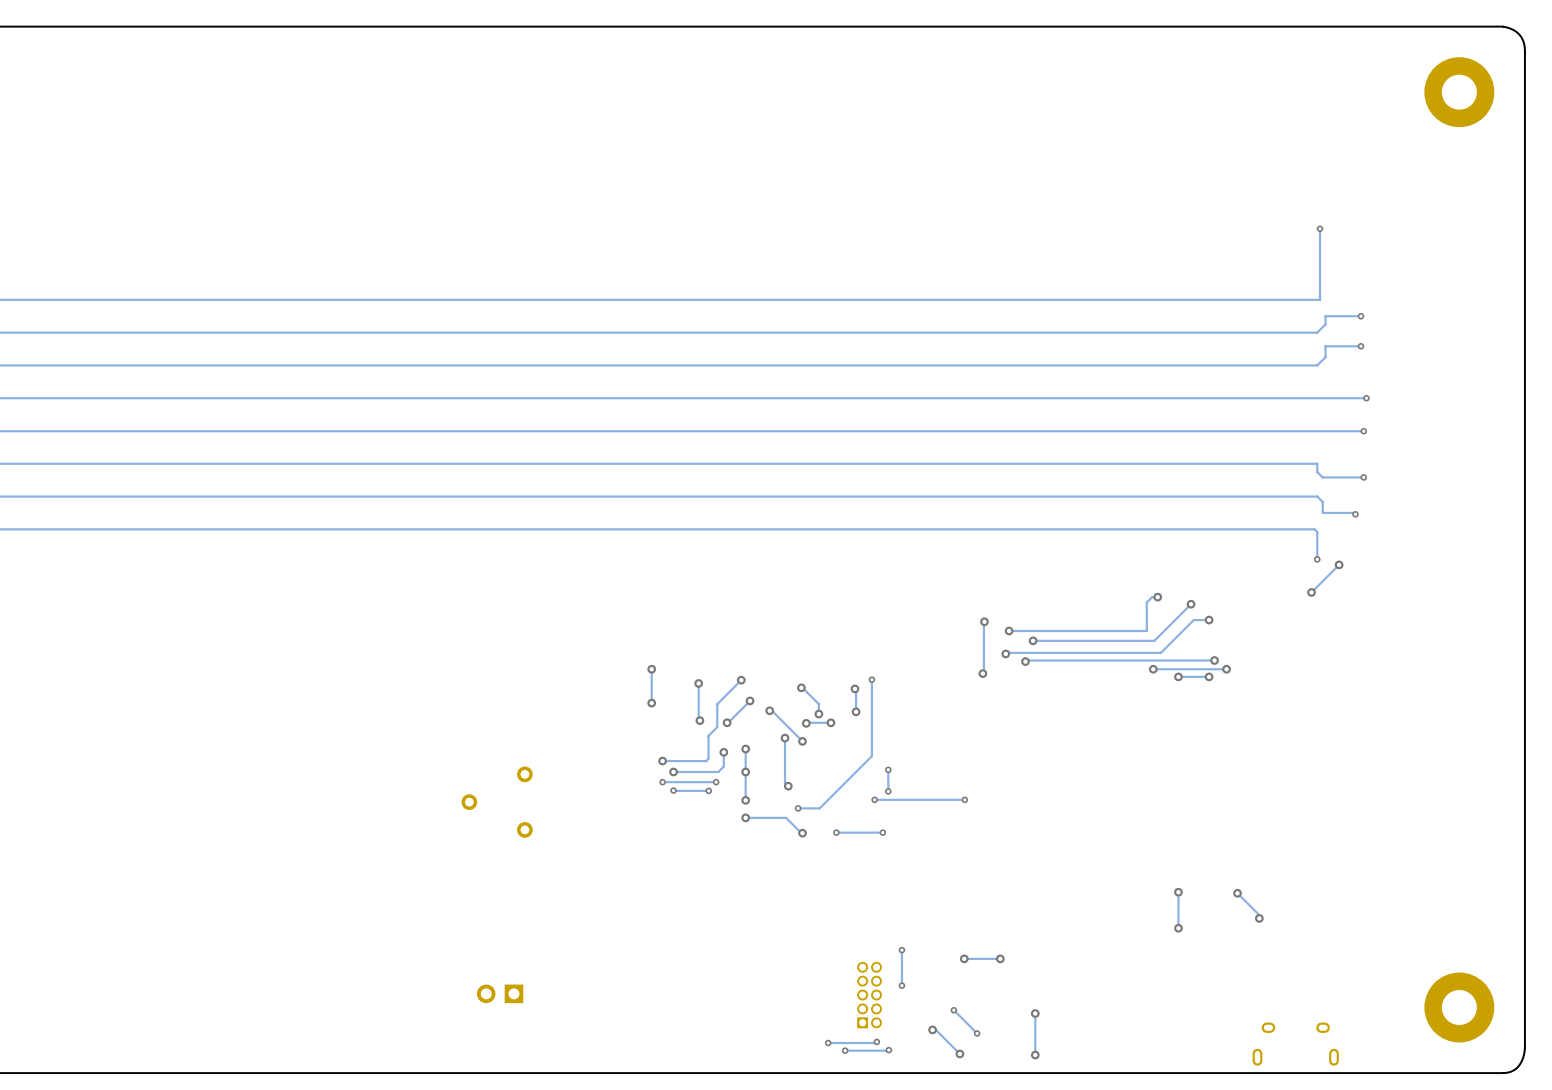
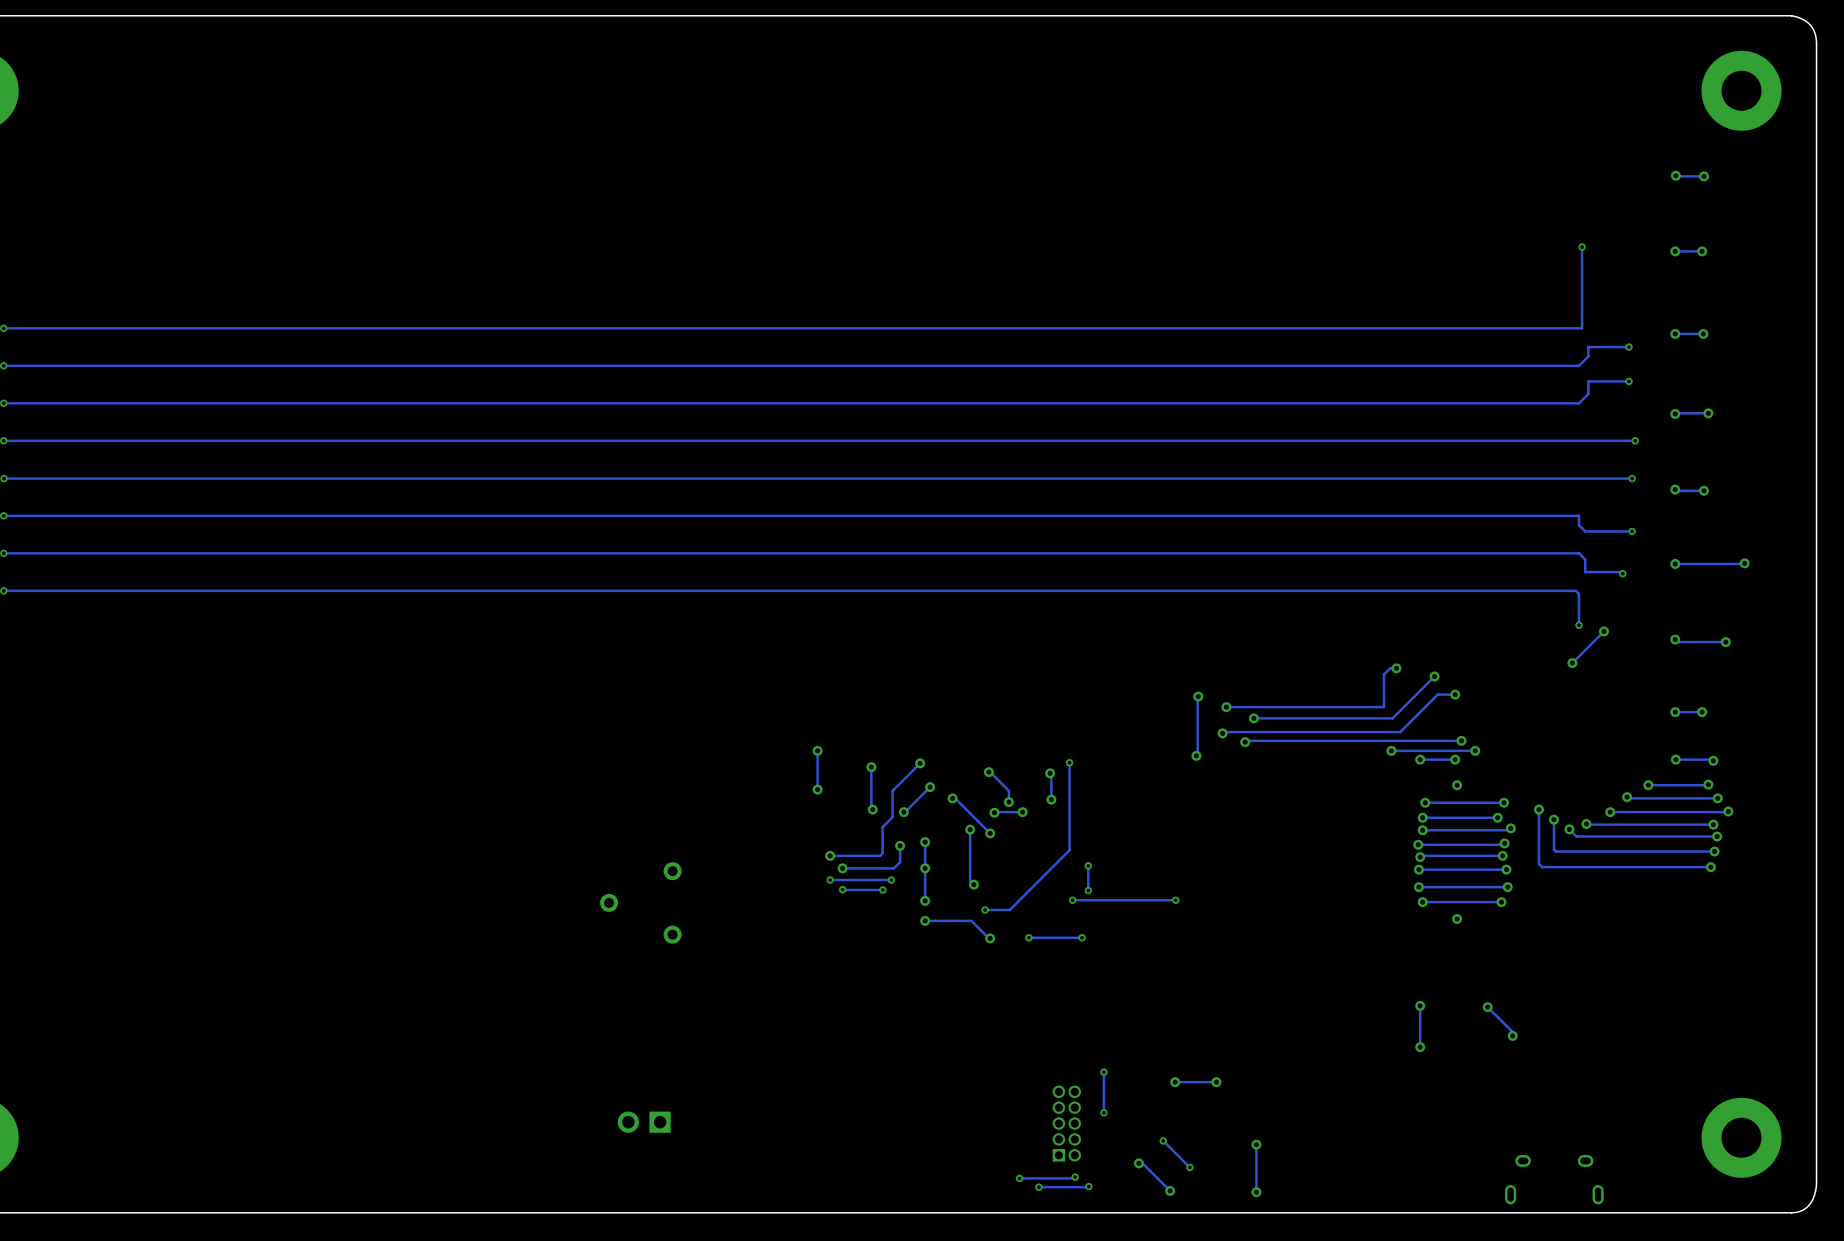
track: none -> (1675, 175) (1704, 176)
via: none -> (1675, 175)
via: none -> (1704, 176)
via: none -> (1675, 251)
track: none -> (1702, 251) (1675, 251)
via: none -> (1702, 251)
via: none -> (1675, 333)
track: none -> (1703, 333) (1674, 333)
via: none -> (1703, 333)
via: none -> (1675, 413)
track: none -> (1708, 413) (1675, 413)
via: none -> (1708, 413)
track: none -> (1675, 489) (1704, 490)
via: none -> (1675, 489)
via: none -> (1704, 490)
via: none -> (1675, 563)
track: none -> (1744, 563) (1675, 563)
via: none -> (1744, 563)
track: none -> (1673, 638) (1677, 642) (1725, 642)
via: none -> (1675, 639)
via: none -> (1725, 642)
via: none -> (1675, 712)
track: none -> (1702, 712) (1673, 712)
via: none -> (1702, 712)
track: none -> (1675, 759) (1713, 760)
via: none -> (1675, 759)
via: none -> (1713, 760)
track: none -> (1708, 784) (1648, 785)
via: none -> (1708, 784)
via: none -> (1457, 785)
via: none -> (1648, 785)
via: none -> (1627, 797)
track: none -> (1717, 798) (1630, 798)
via: none -> (1717, 798)
via: none -> (1425, 802)
track: none -> (1503, 802) (1425, 802)
via: none -> (1503, 802)
track: none -> (1538, 809) (1538, 864) (1542, 867) (1710, 867)
via: none -> (1538, 809)
via: none -> (1610, 812)
track: none -> (1728, 811) (1610, 812)
via: none -> (1728, 811)
via: none -> (1422, 817)
track: none -> (1497, 817) (1422, 817)
via: none -> (1497, 817)
track: none -> (1553, 819) (1553, 849) (1555, 851) (1714, 851)
via: none -> (1553, 819)
track: none -> (1586, 824) (1713, 824)
via: none -> (1586, 824)
via: none -> (1713, 824)
track: none -> (1510, 828) (1508, 830) (1422, 830)
via: none -> (1510, 828)
track: none -> (1569, 829) (1576, 836) (1717, 836)
via: none -> (1569, 829)
via: none -> (1422, 830)
via: none -> (1717, 836)
track: none -> (1504, 843) (1418, 844)
via: none -> (1504, 843)
via: none -> (1418, 844)
via: none -> (1714, 851)
track: none -> (1502, 855) (1420, 857)
via: none -> (1502, 855)
via: none -> (1420, 857)
via: none -> (1710, 867)
via: none -> (1418, 869)
track: none -> (1506, 869) (1418, 869)
via: none -> (1506, 869)
via: none -> (1418, 887)
track: none -> (1507, 887) (1418, 887)
via: none -> (1507, 887)
via: none -> (1422, 902)
track: none -> (1501, 902) (1422, 902)
via: none -> (1501, 902)
via: none -> (1457, 919)

